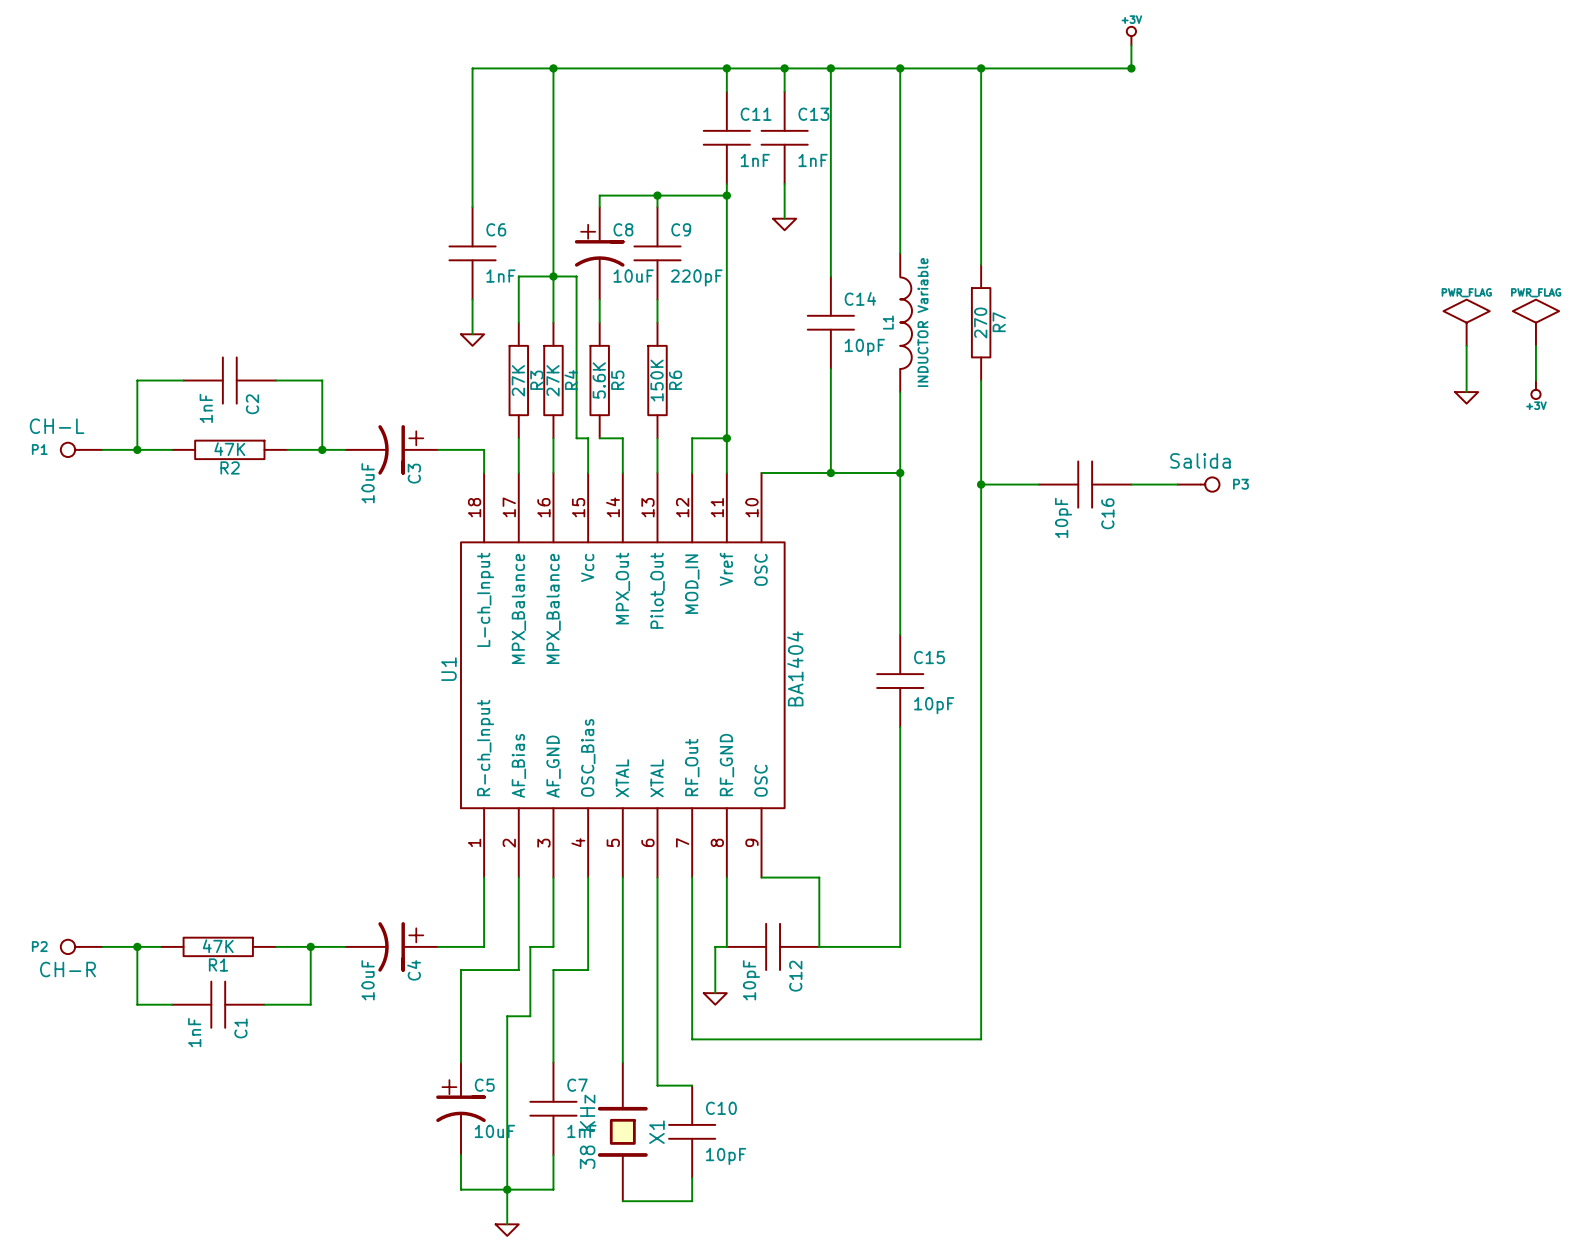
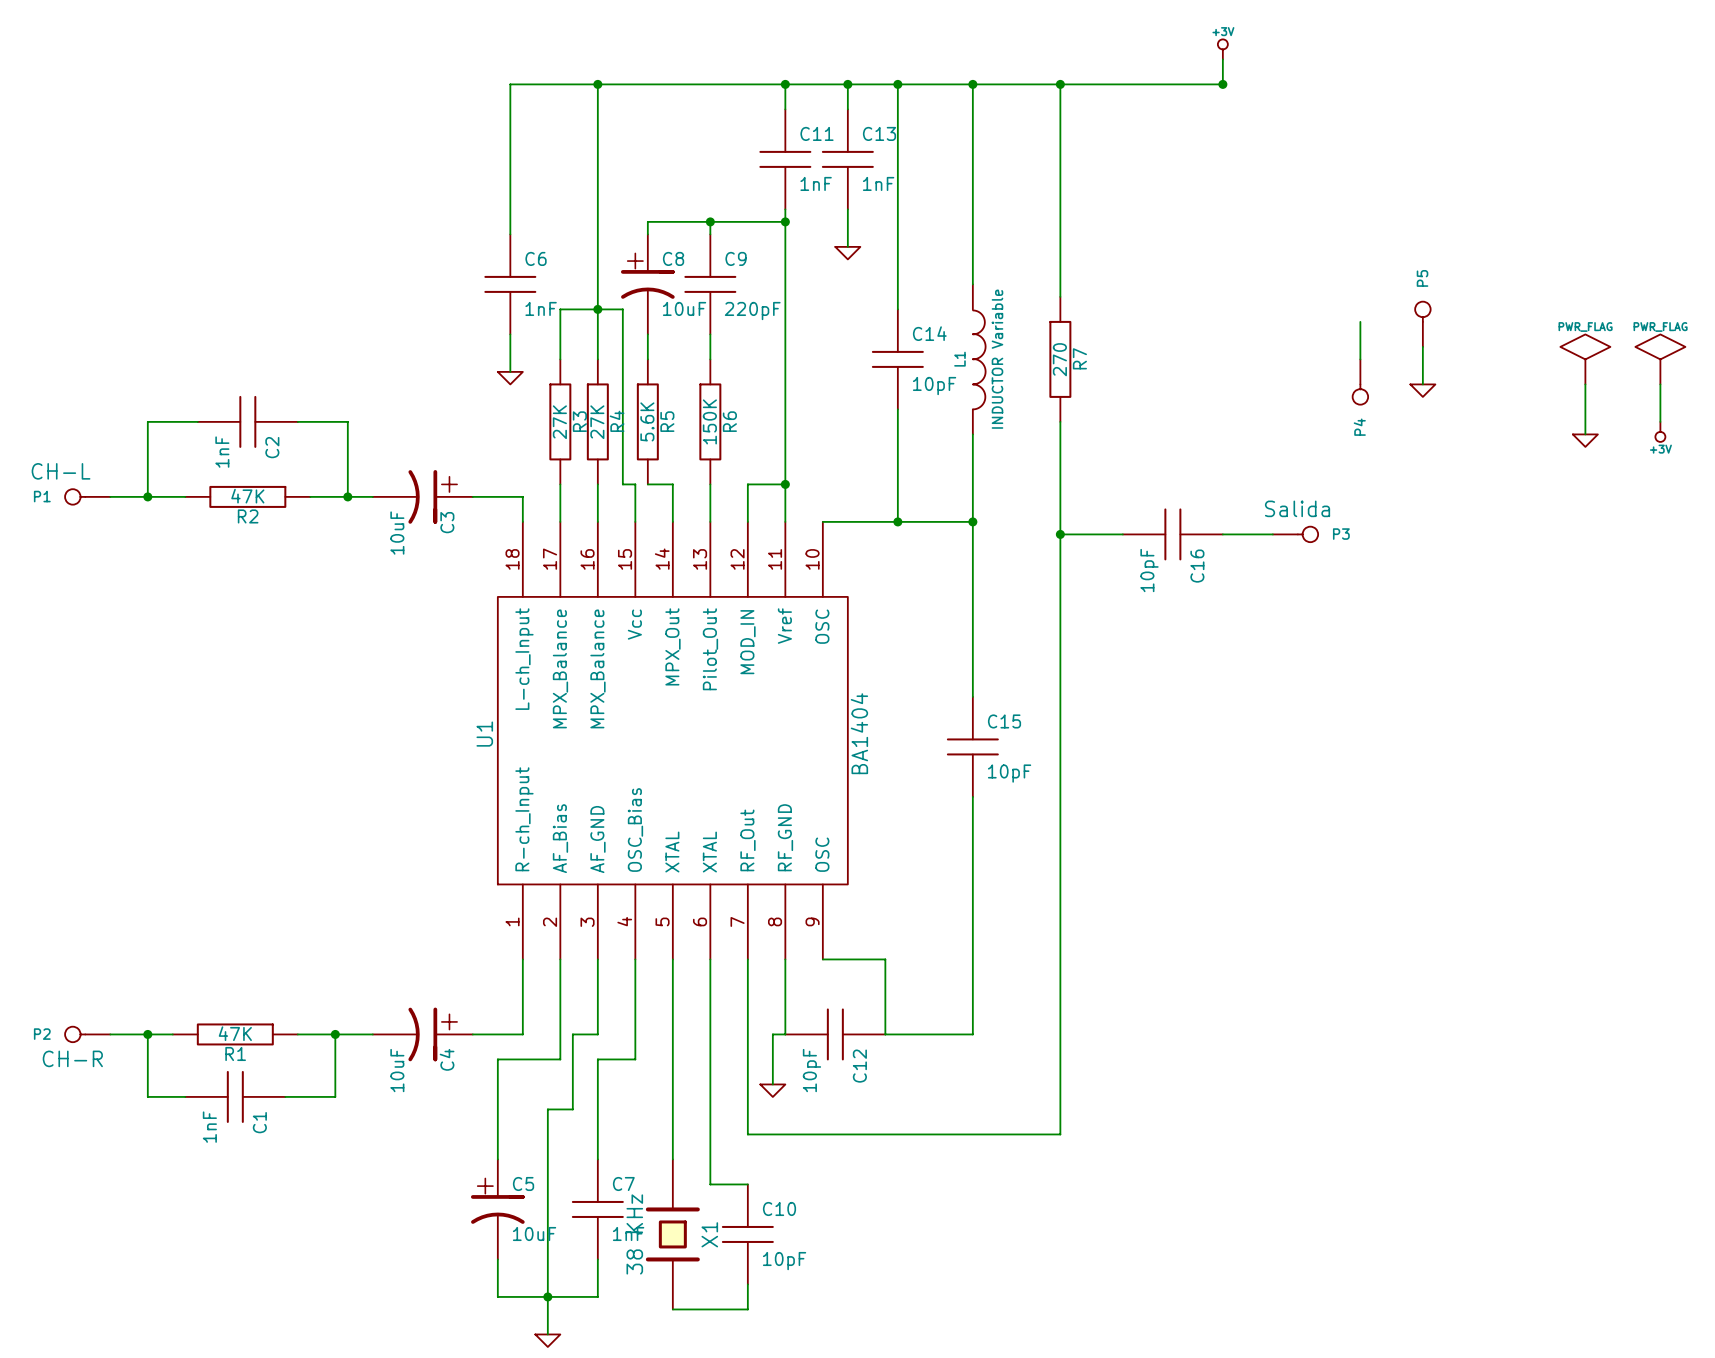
wire: none -> (1360, 321) (1360, 359)
P5: none -> (1422, 324)
wire: none -> (1422, 346) (1422, 384)
P4: none -> (1360, 382)
power symbol: none -> (1422, 390)

